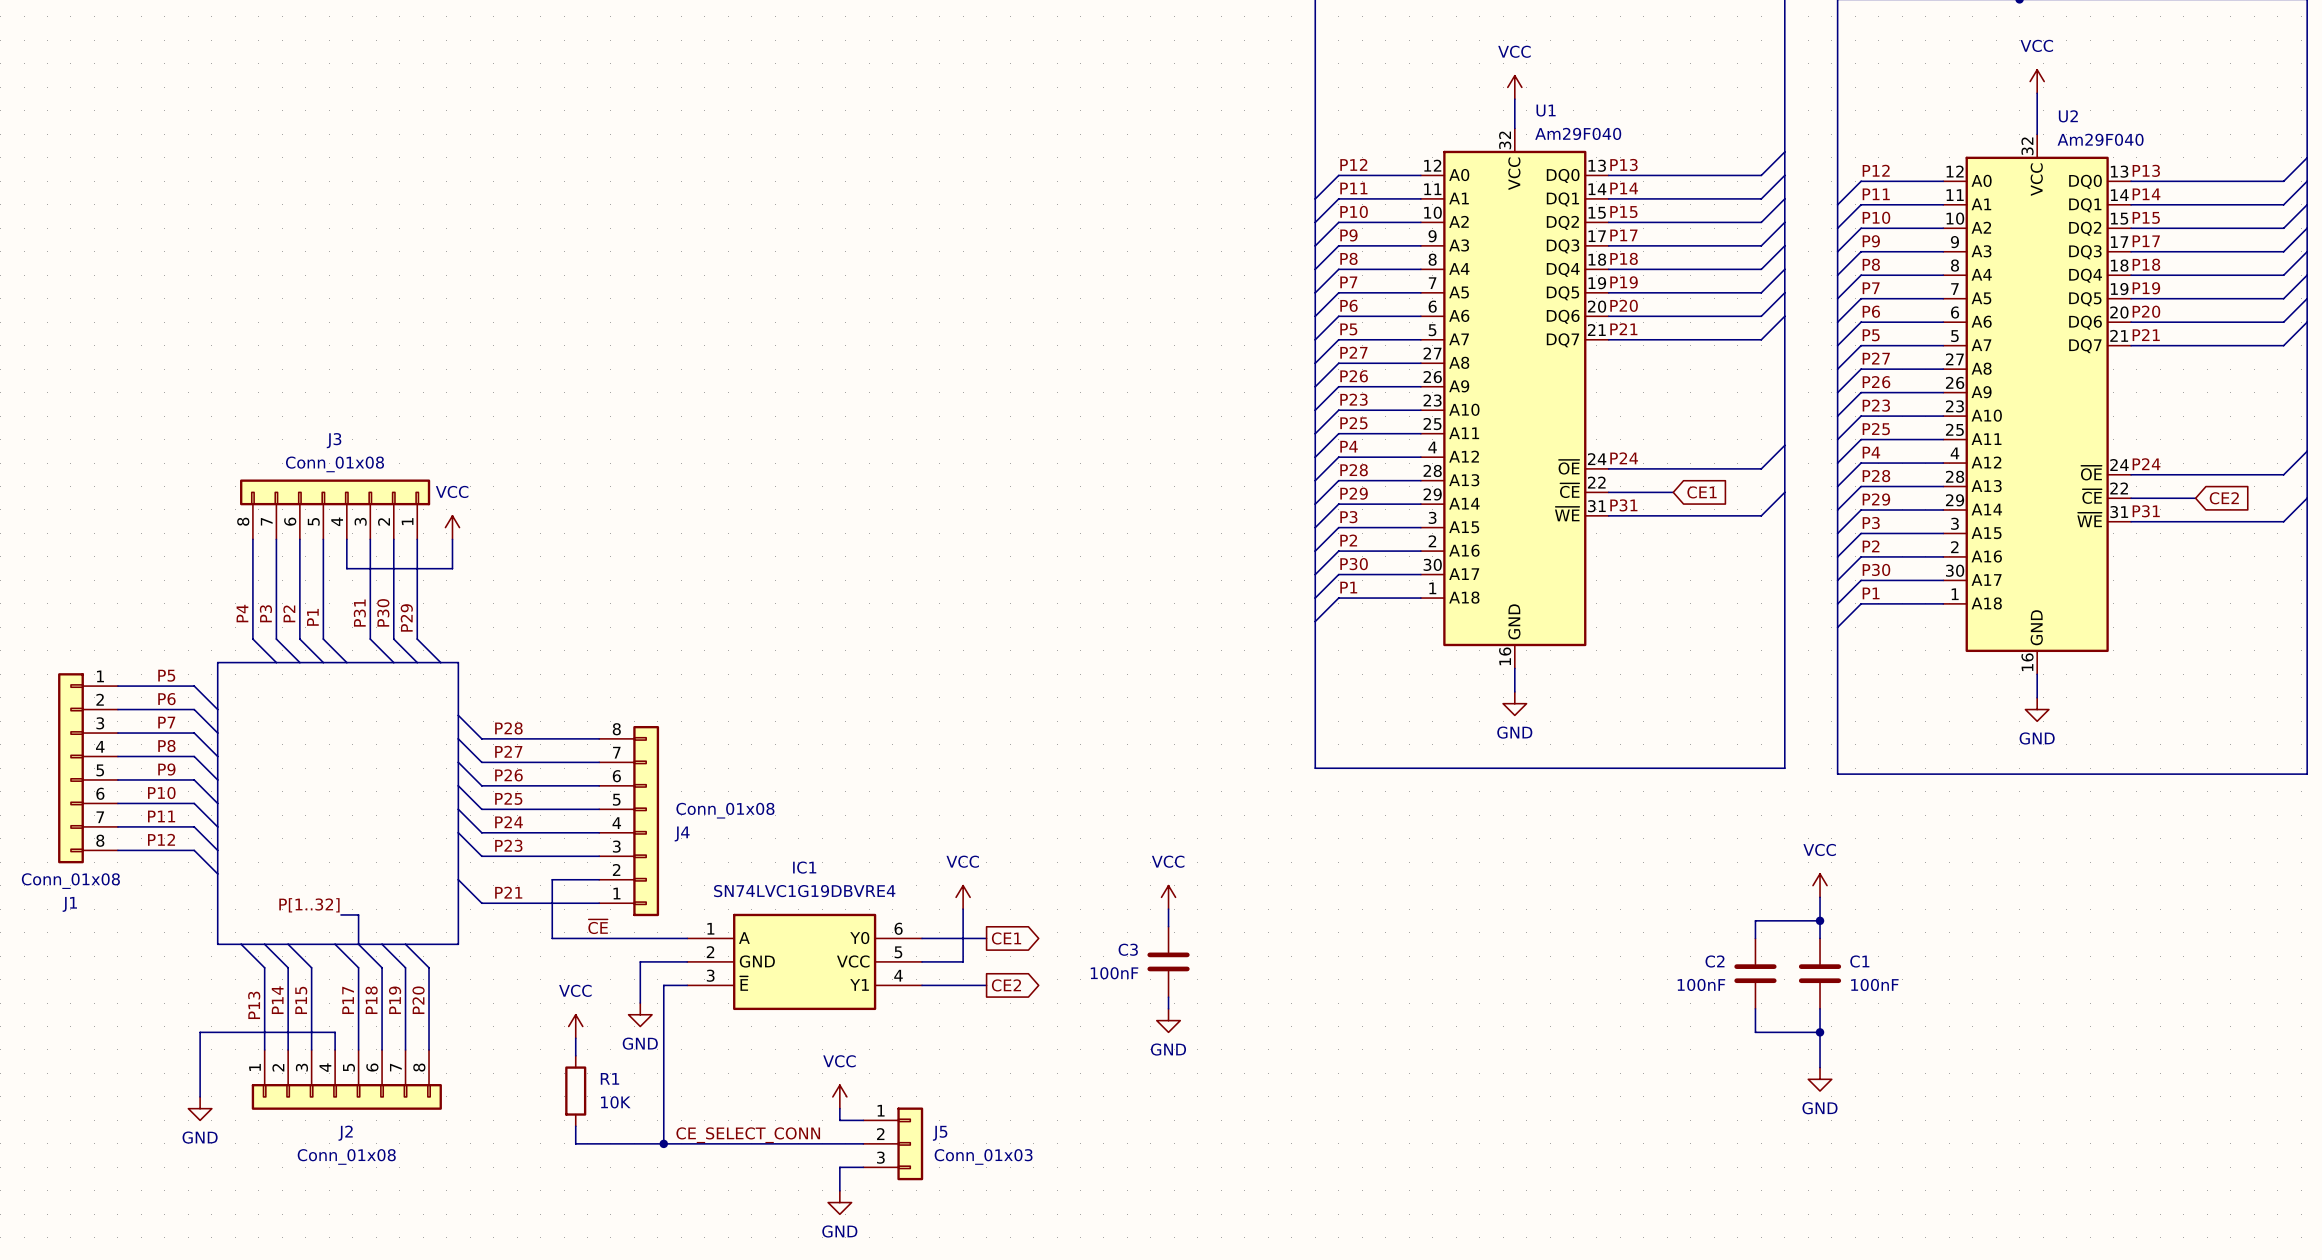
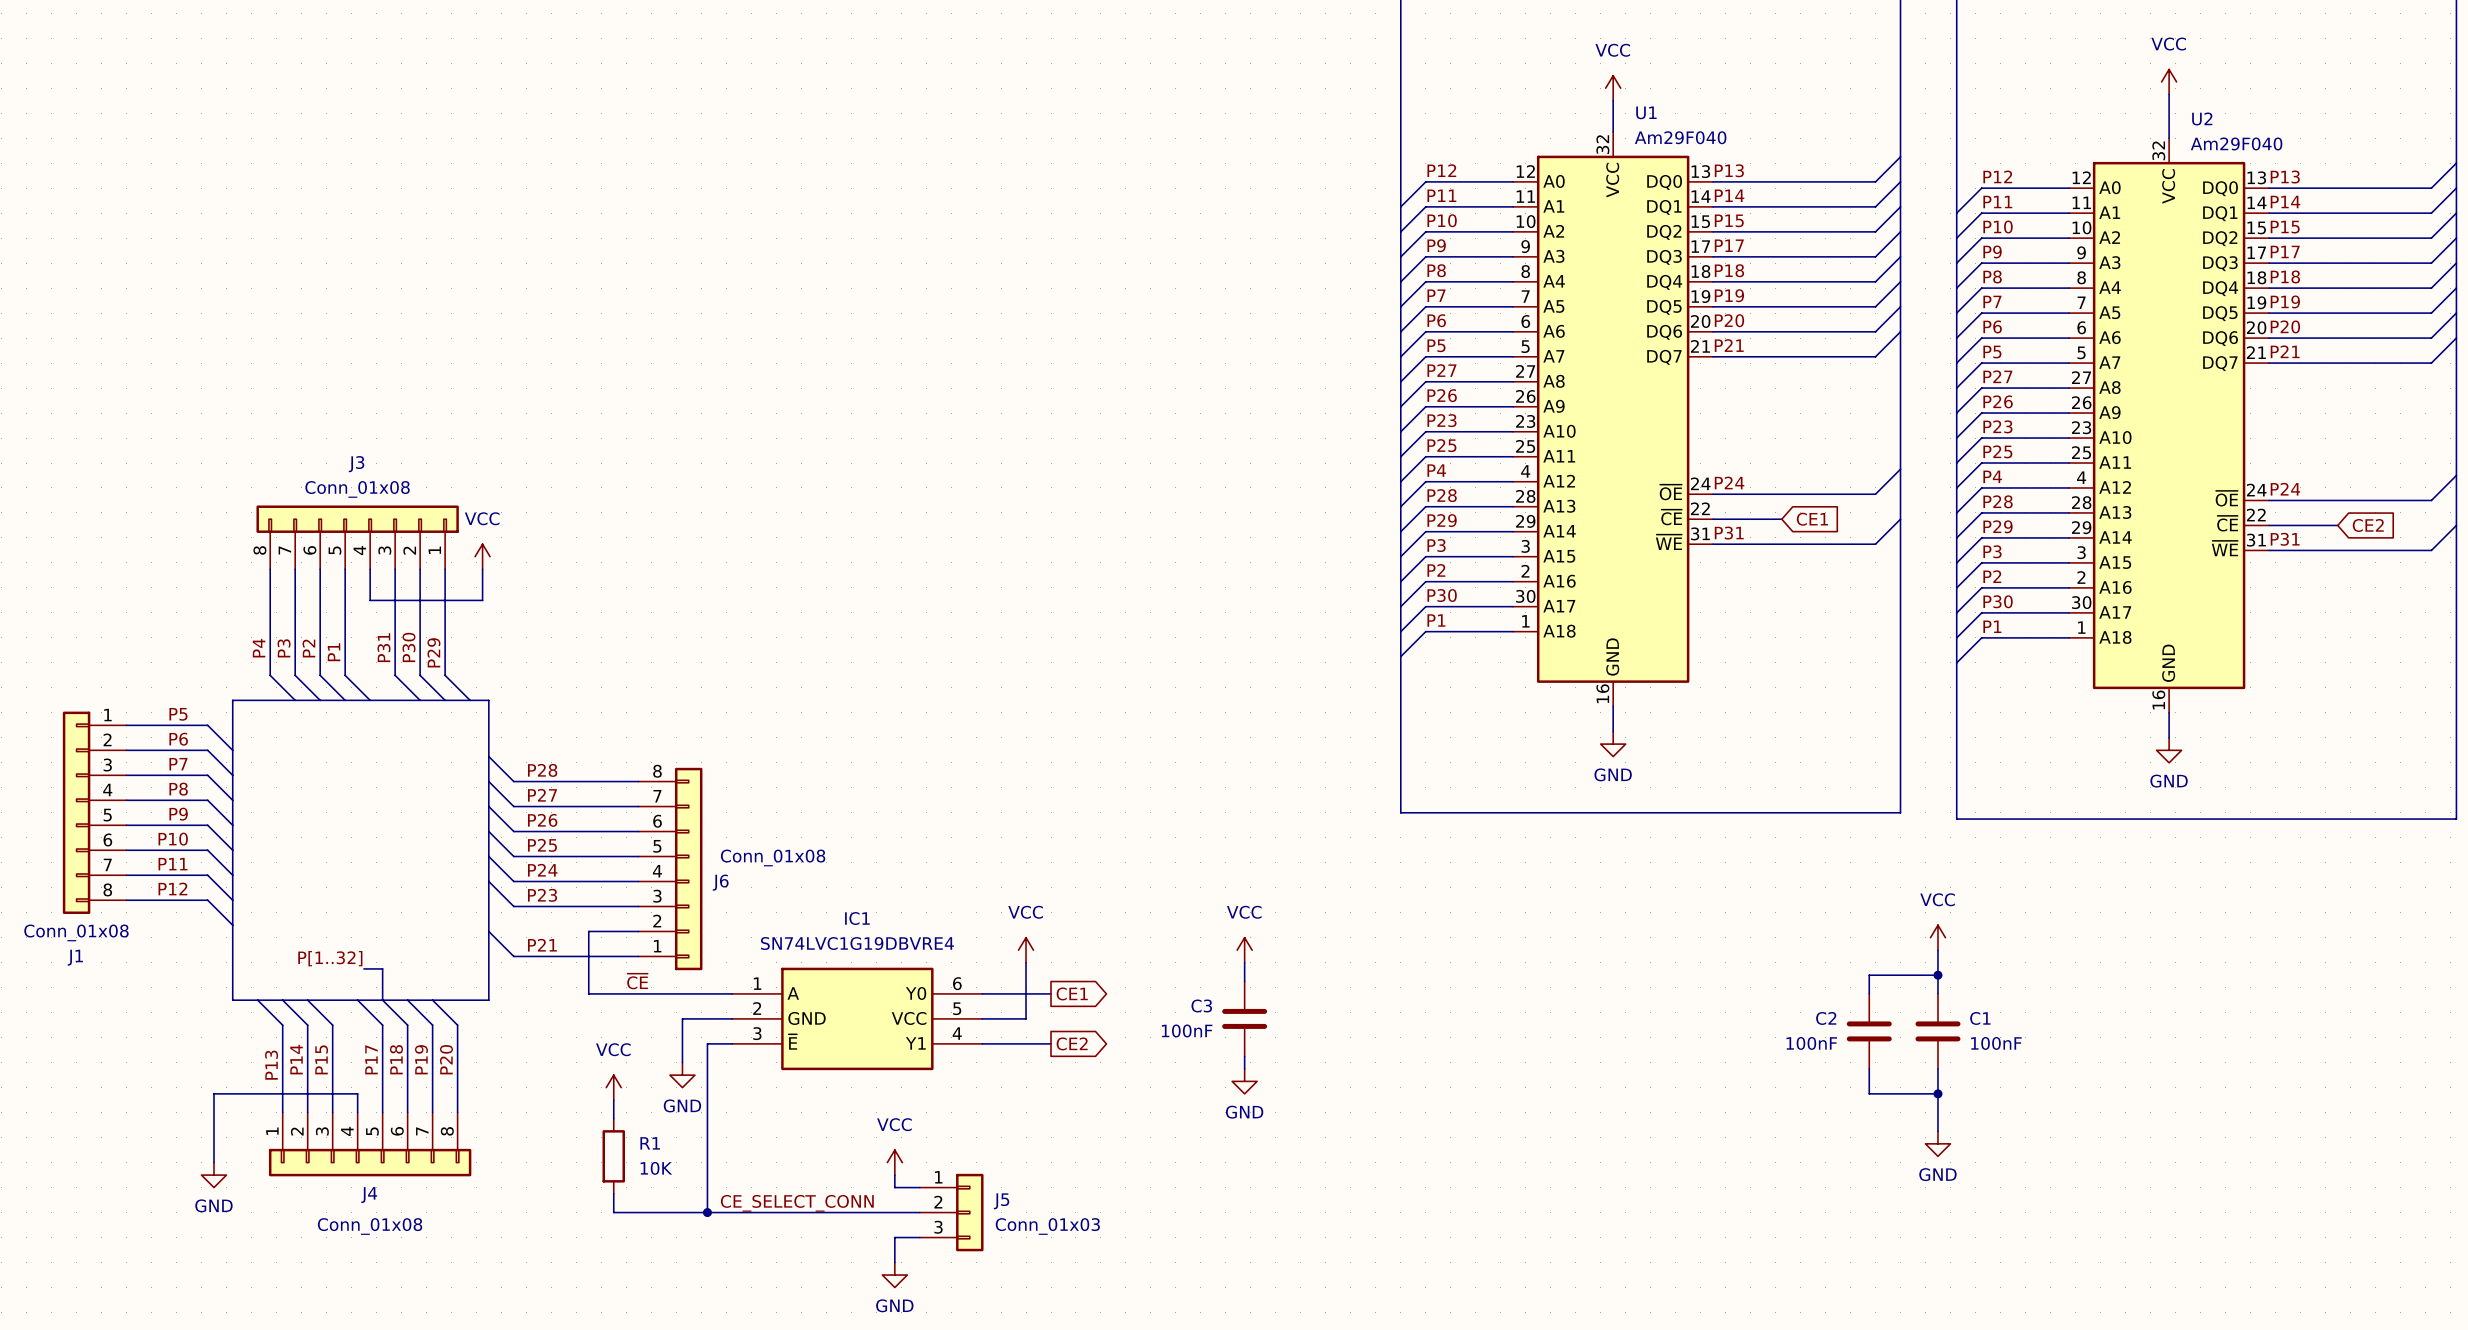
J4 name: J4 (682, 833) -> J6 (720, 882)
J2 name: J2 (345, 1133) -> J4 (369, 1195)

